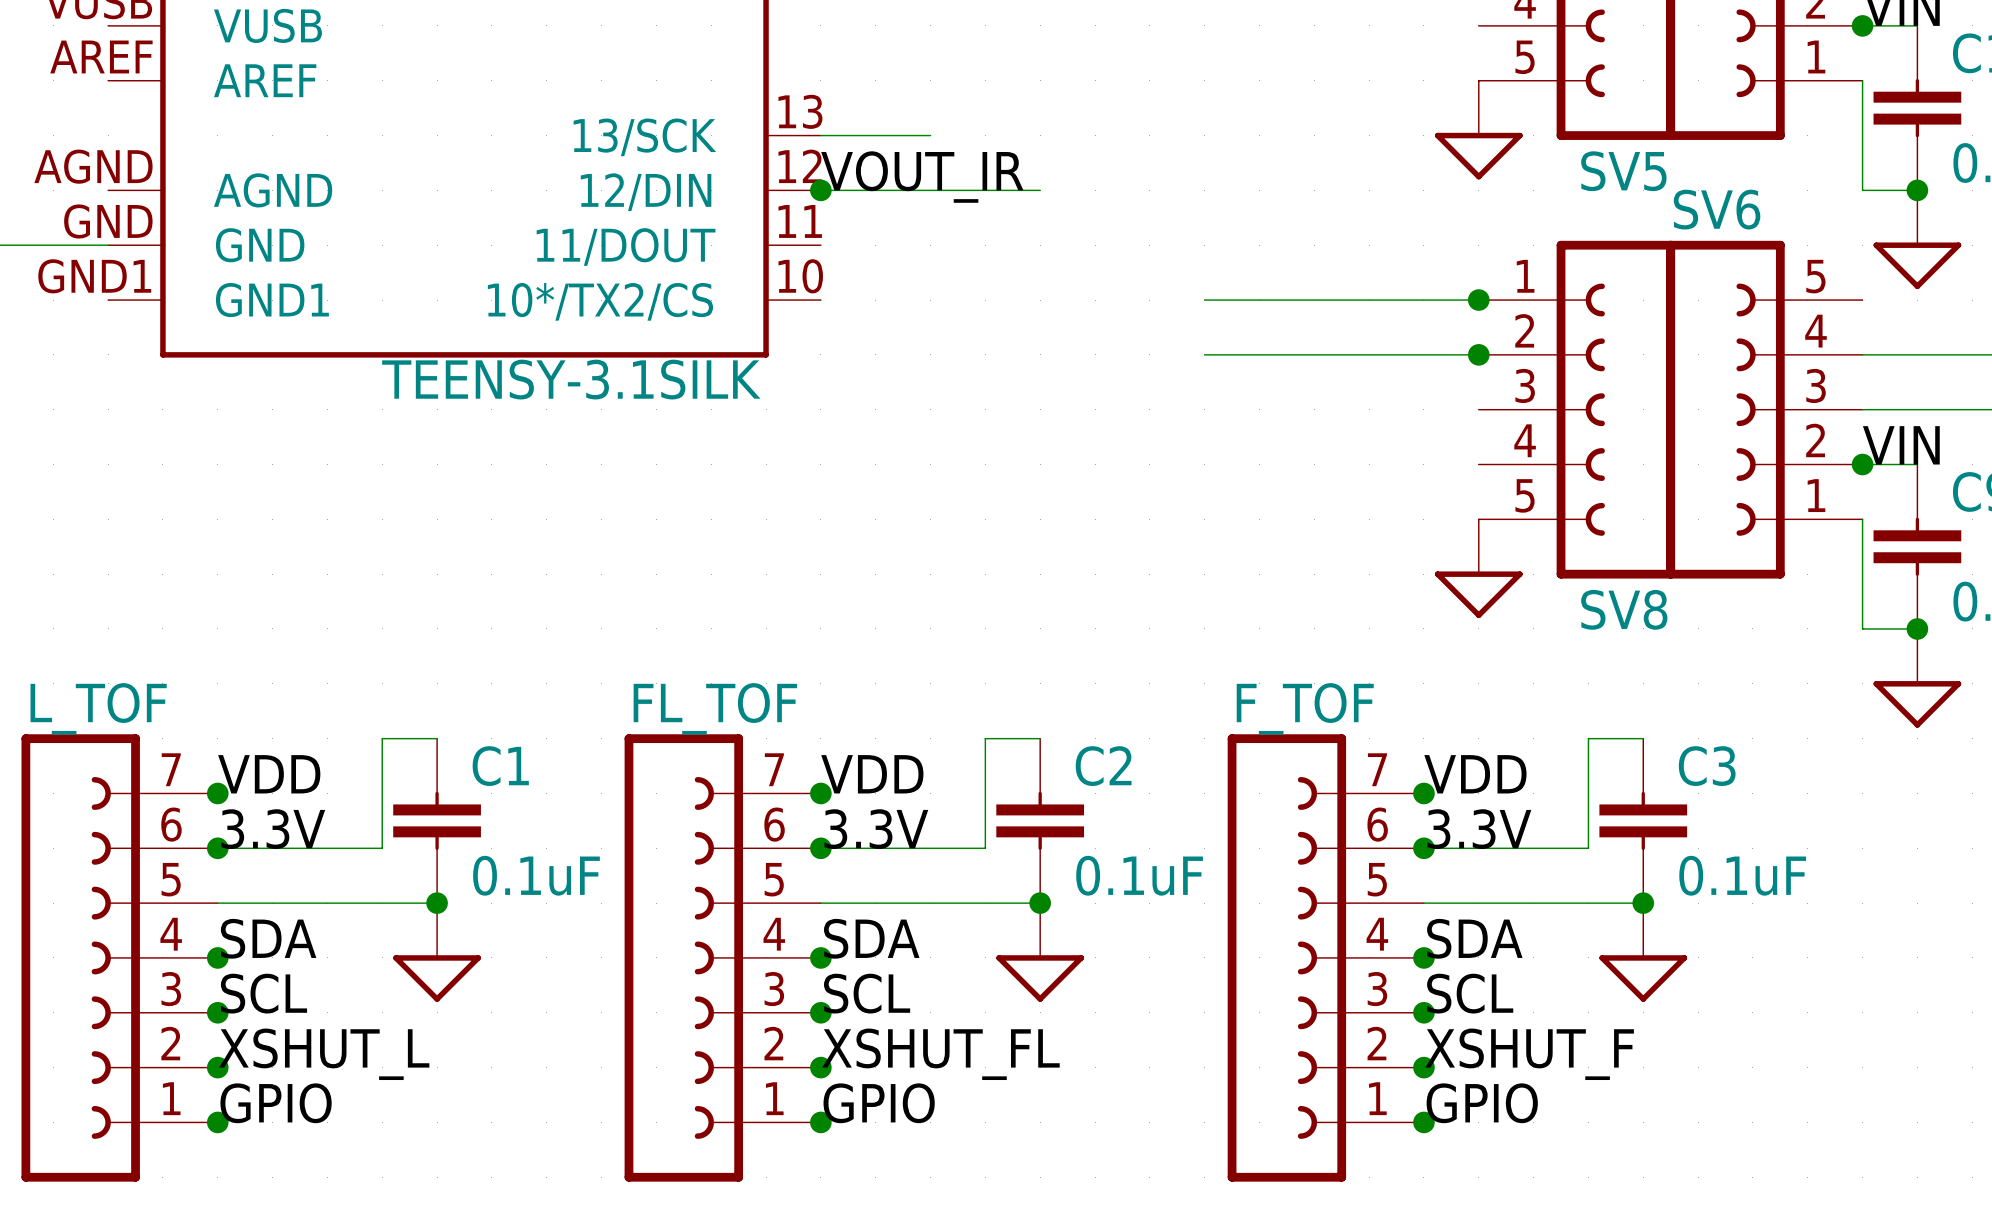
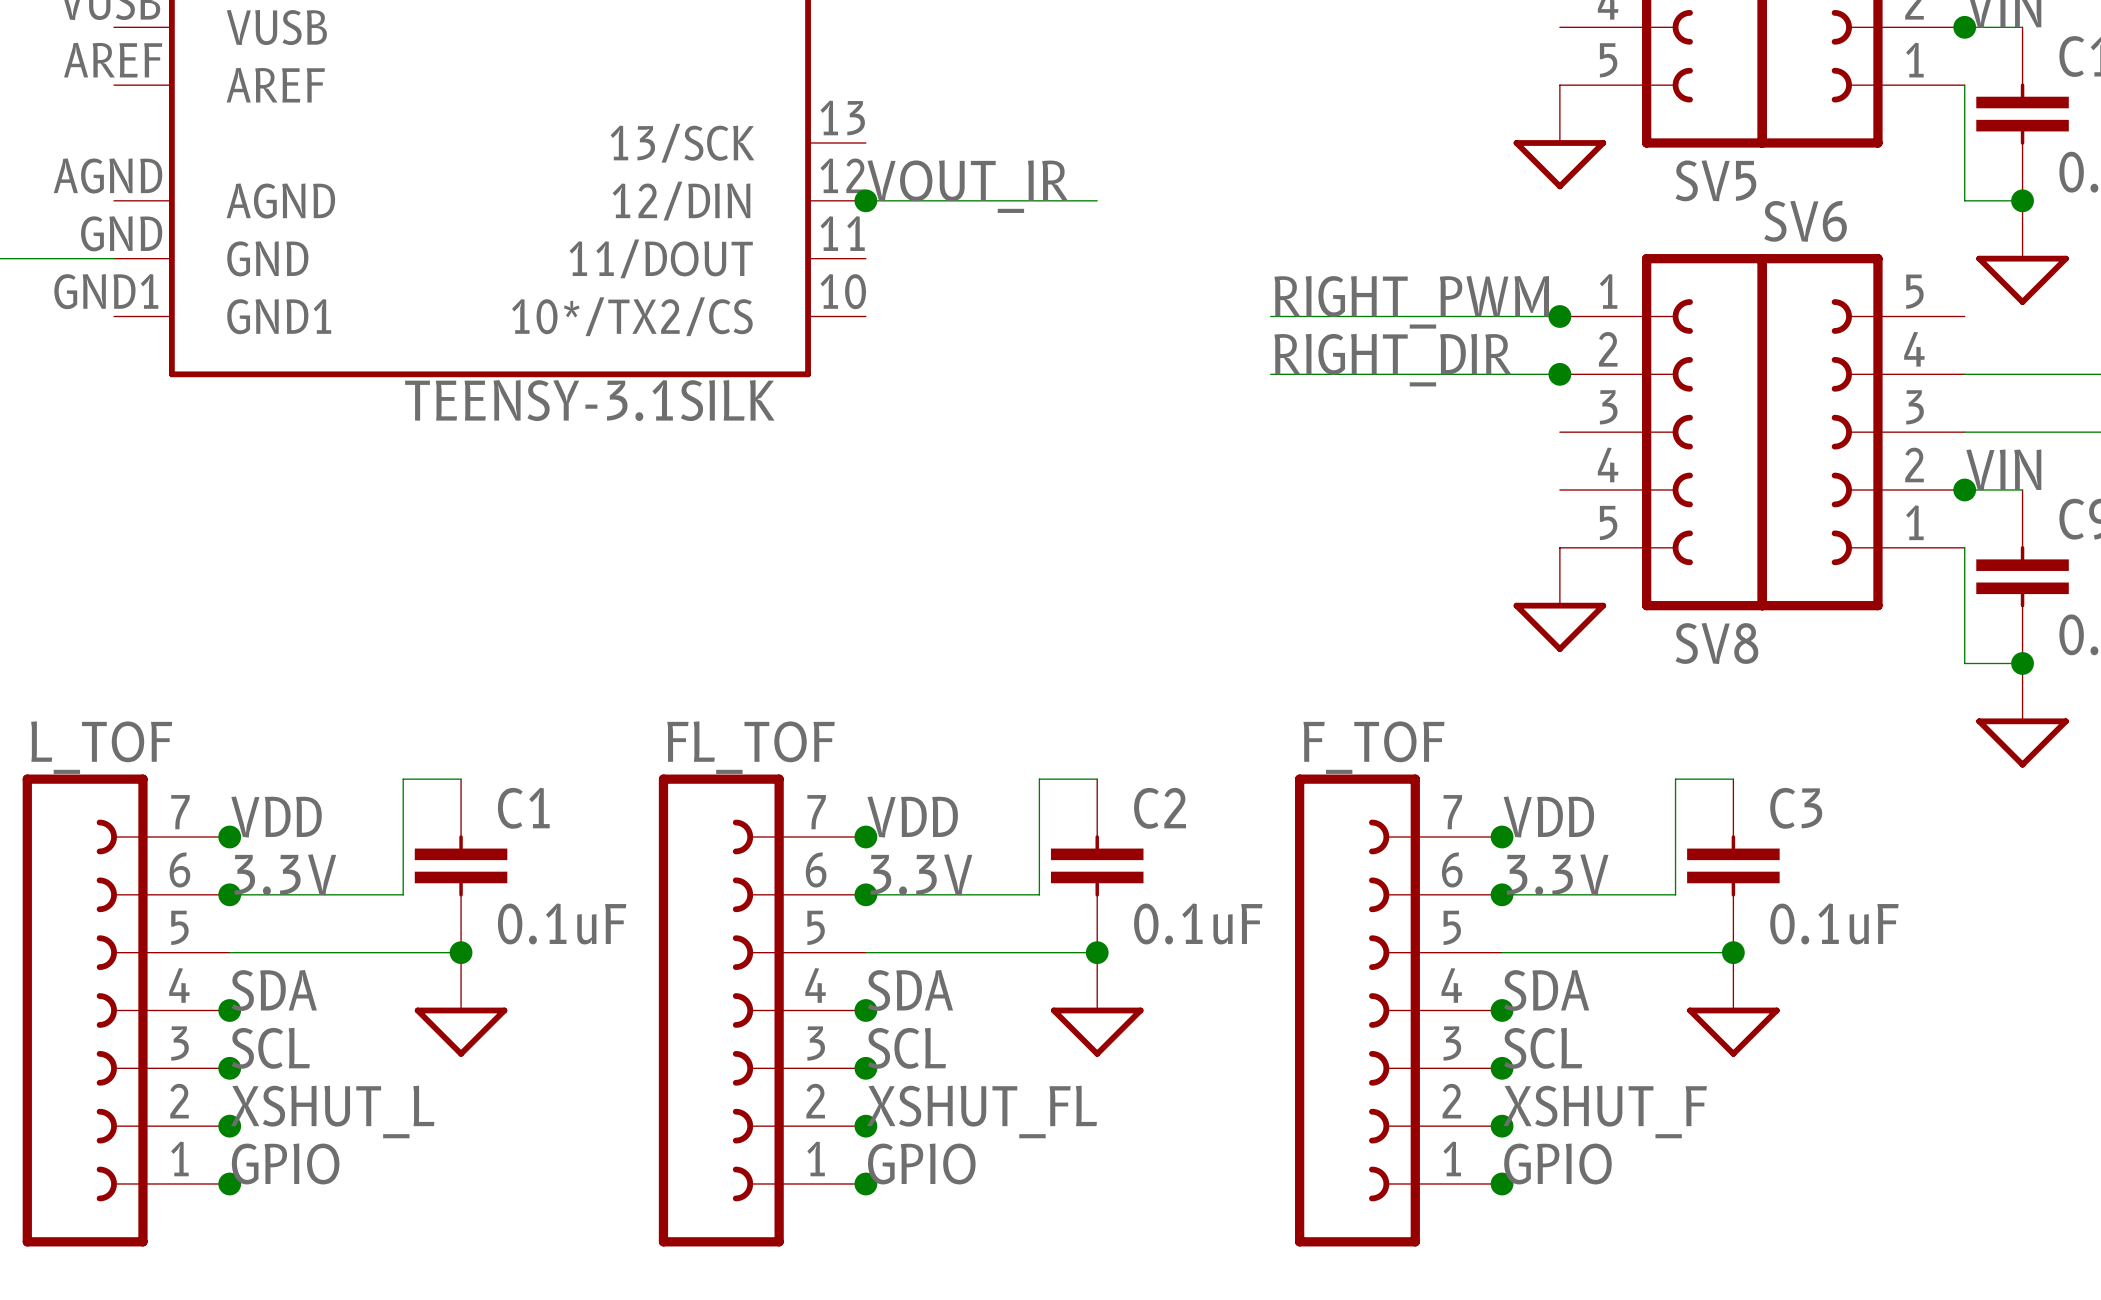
wire: (820, 135) (930, 135) -> none
label: none -> RIGHT_PWM (1411, 302)
label: none -> RIGHT_DIR (1392, 360)

